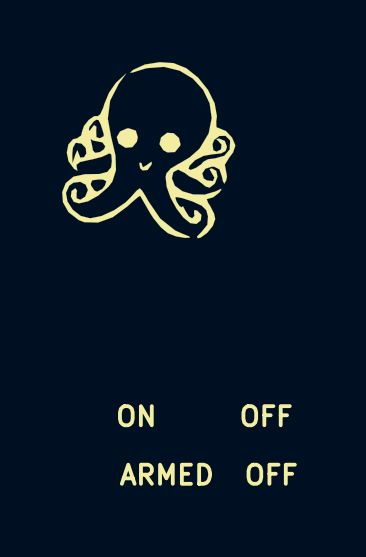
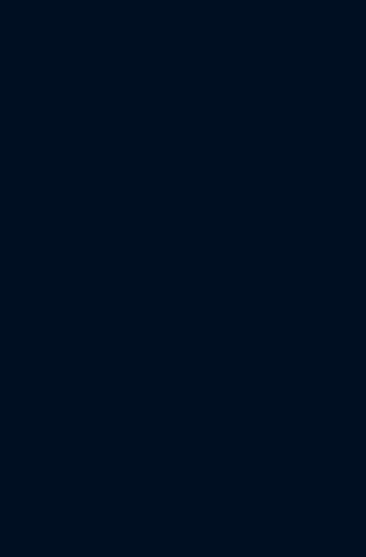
drawing: [62, 62, 236, 239] -> none
text: ON (135, 415) -> none
text: OFF (266, 415) -> none
text: ARMED (165, 474) -> none
text: OFF (271, 474) -> none

